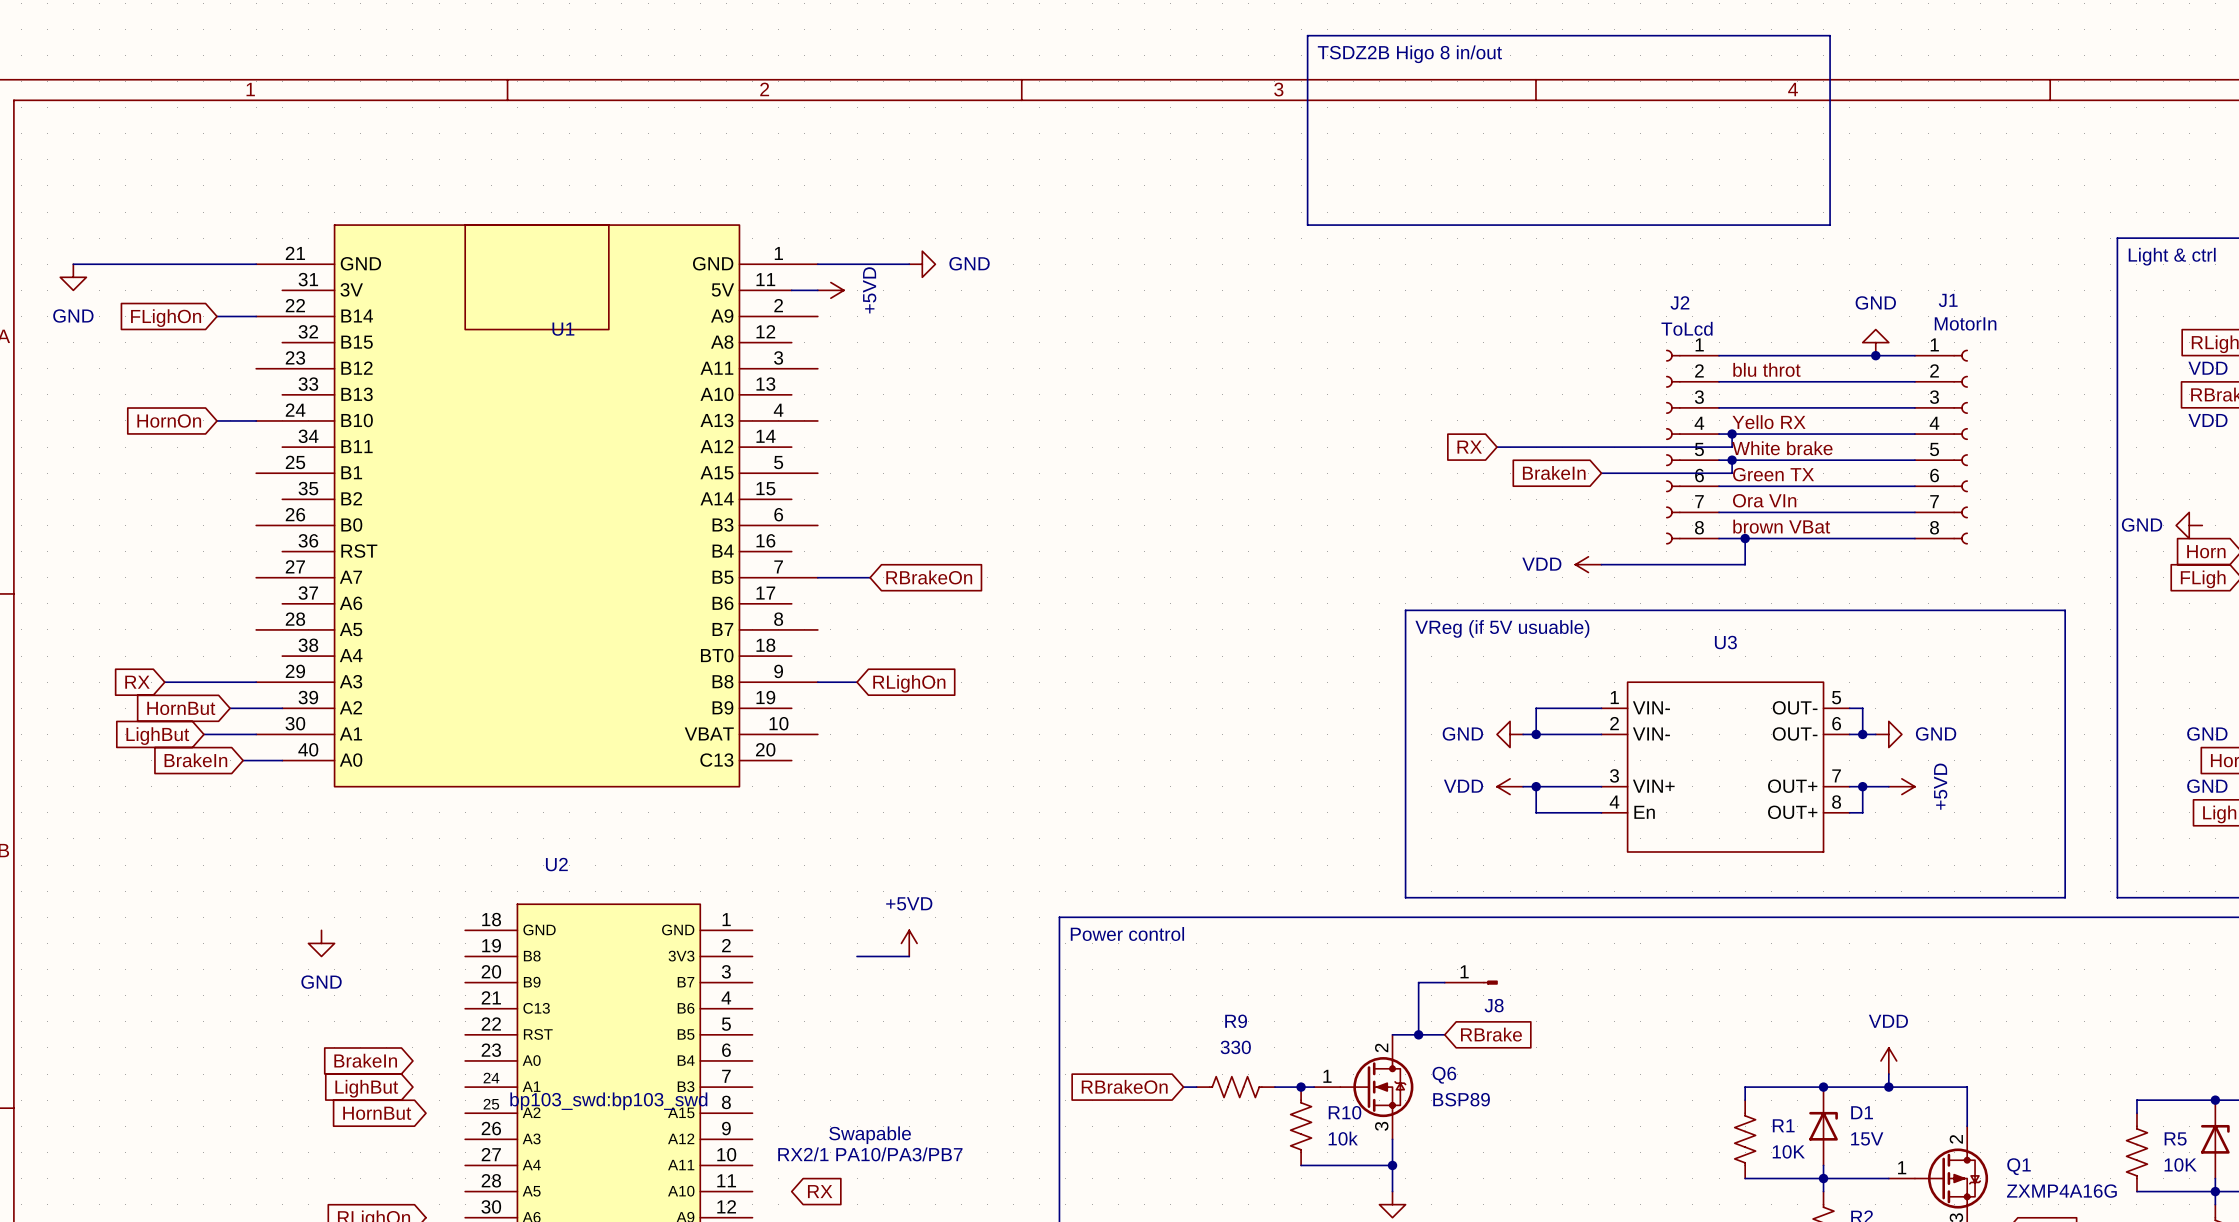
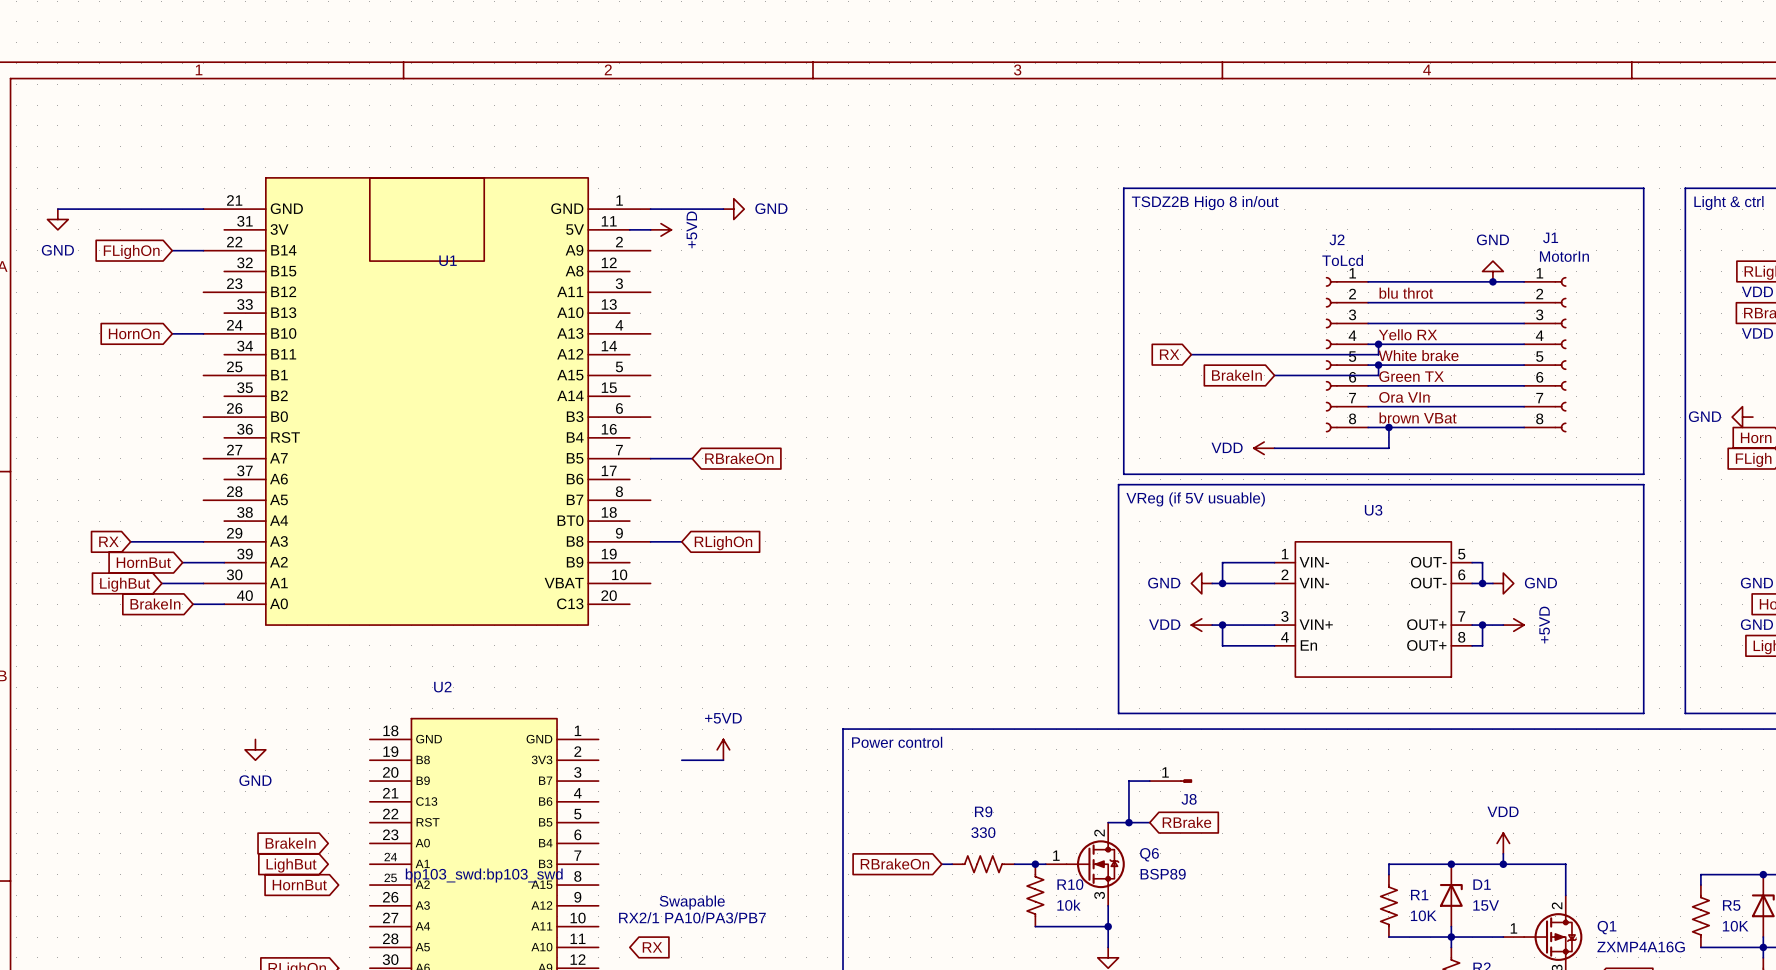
line: (1307, 35) (1830, 35) (1830, 225) (1307, 225) (1307, 35) -> none
text position: TSDZ2B Higo 8 in/out (1409, 54) -> TSDZ2B Higo 8 in/out (1205, 203)
line: none -> (1123, 188) (1643, 188) (1643, 474) (1123, 474) (1123, 188)

